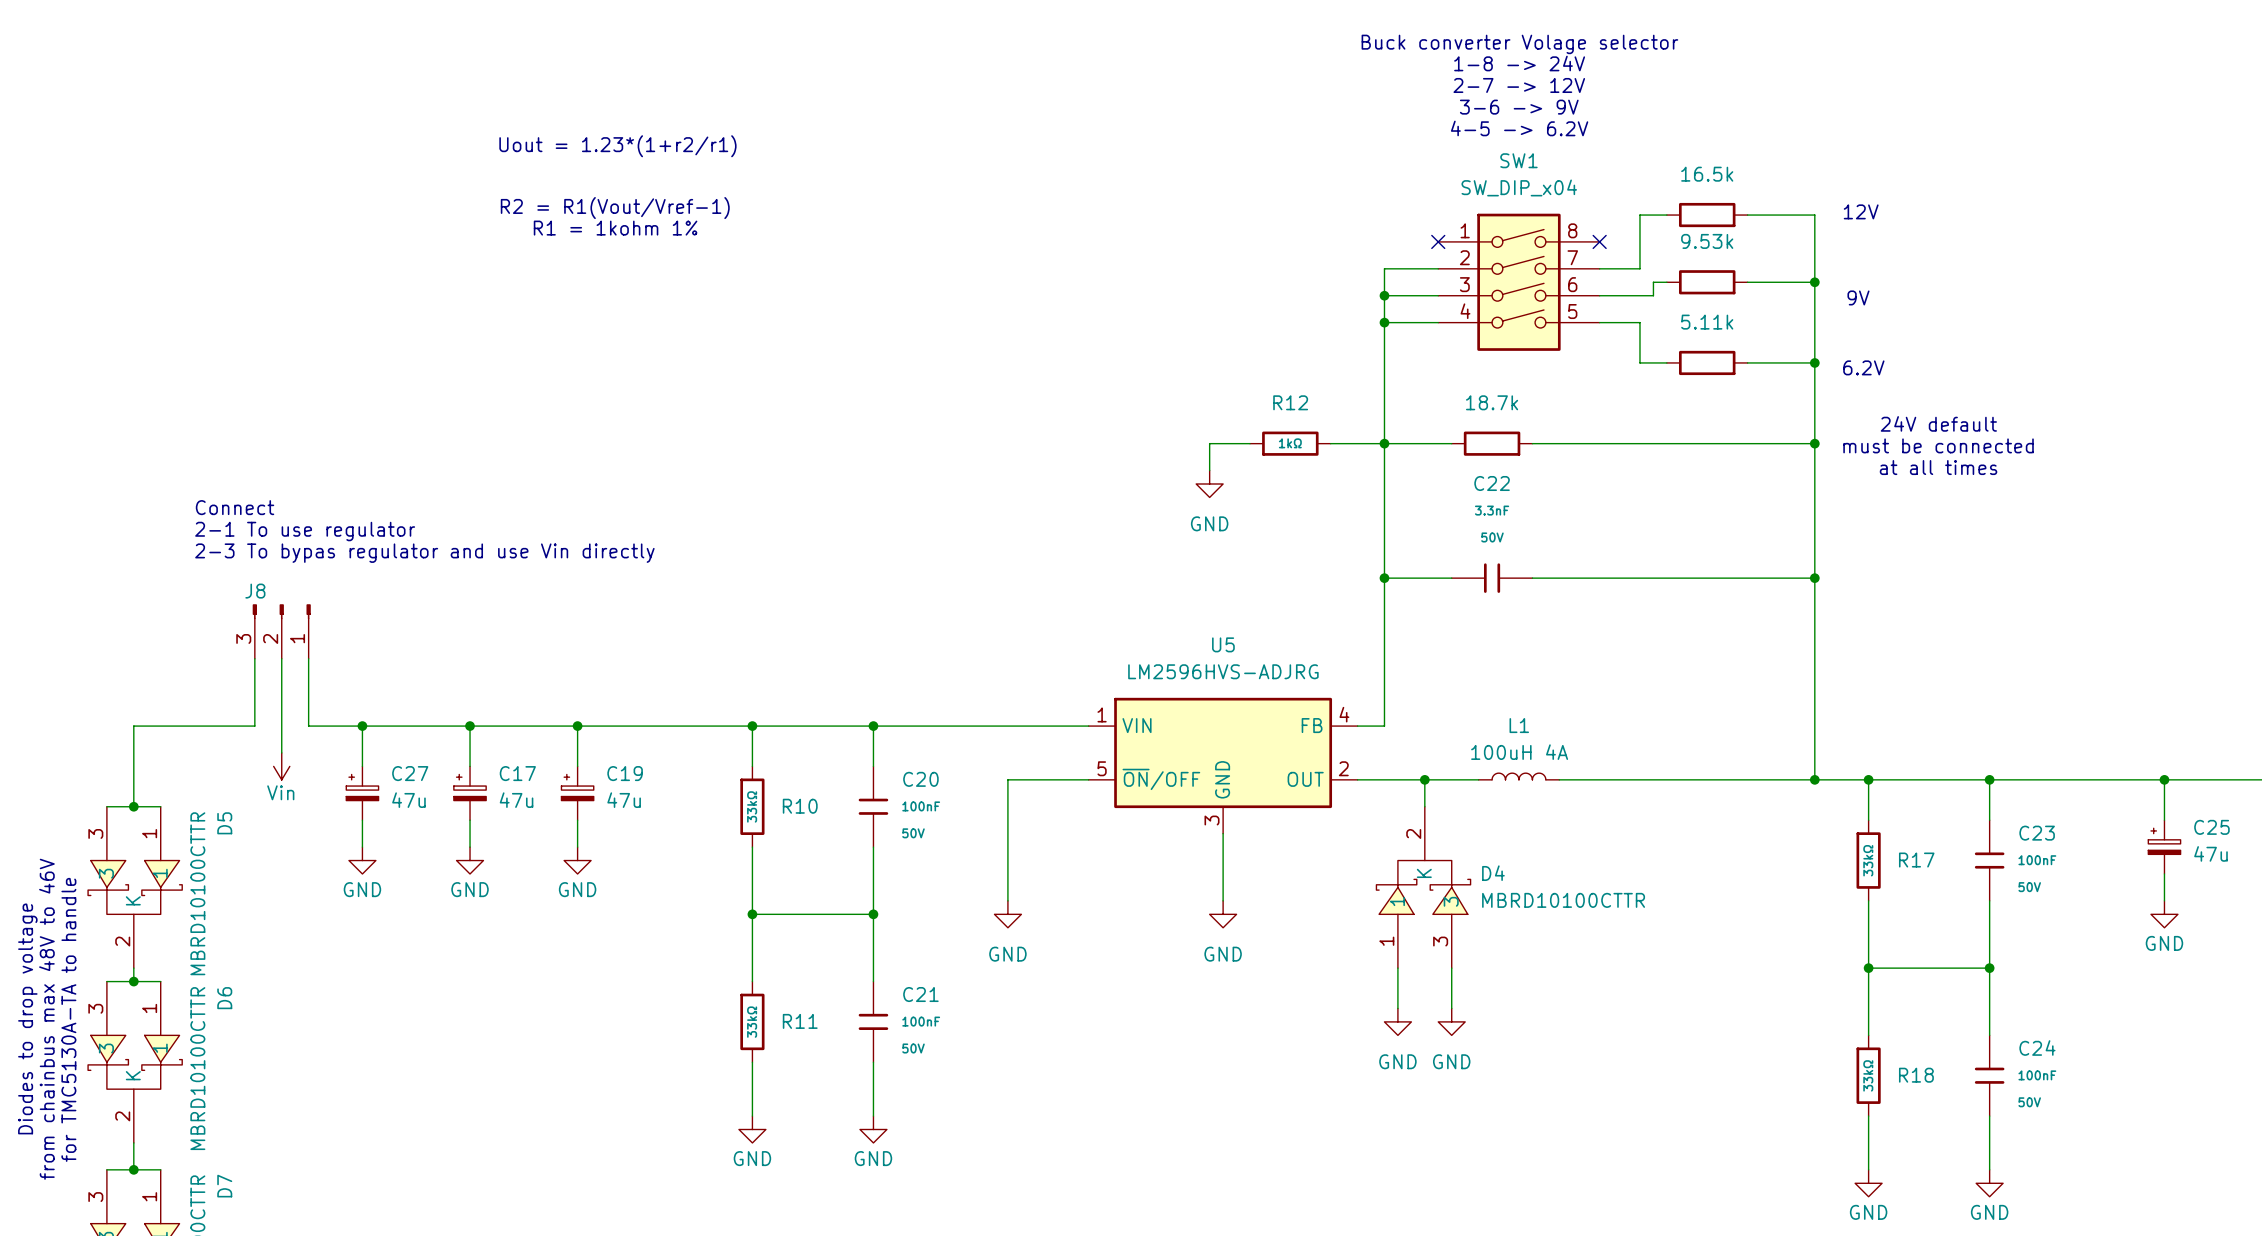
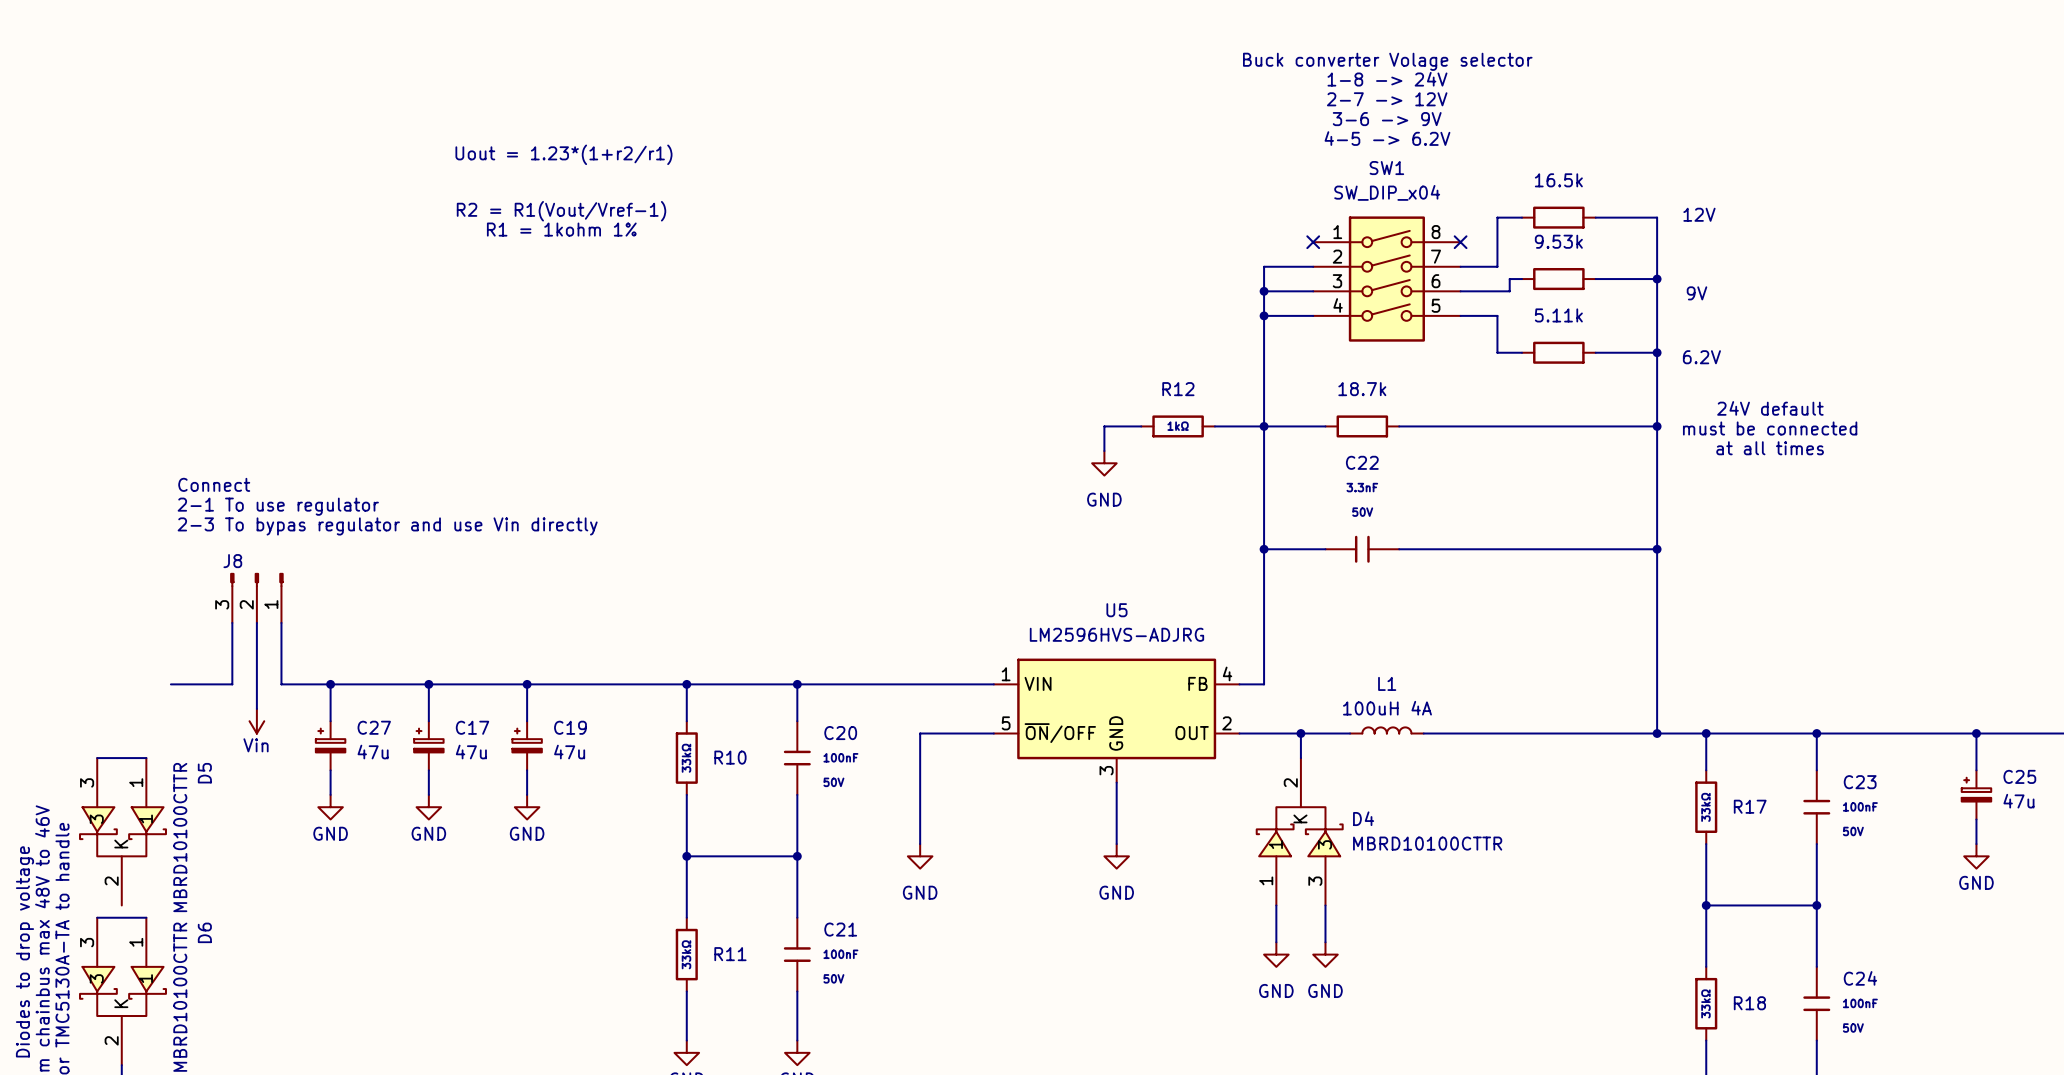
wire: (187, 726) (133, 726) (133, 806) -> none
junction: (133, 806) -> none
wire: (133, 968) (133, 981) -> none
junction: (133, 981) -> none

